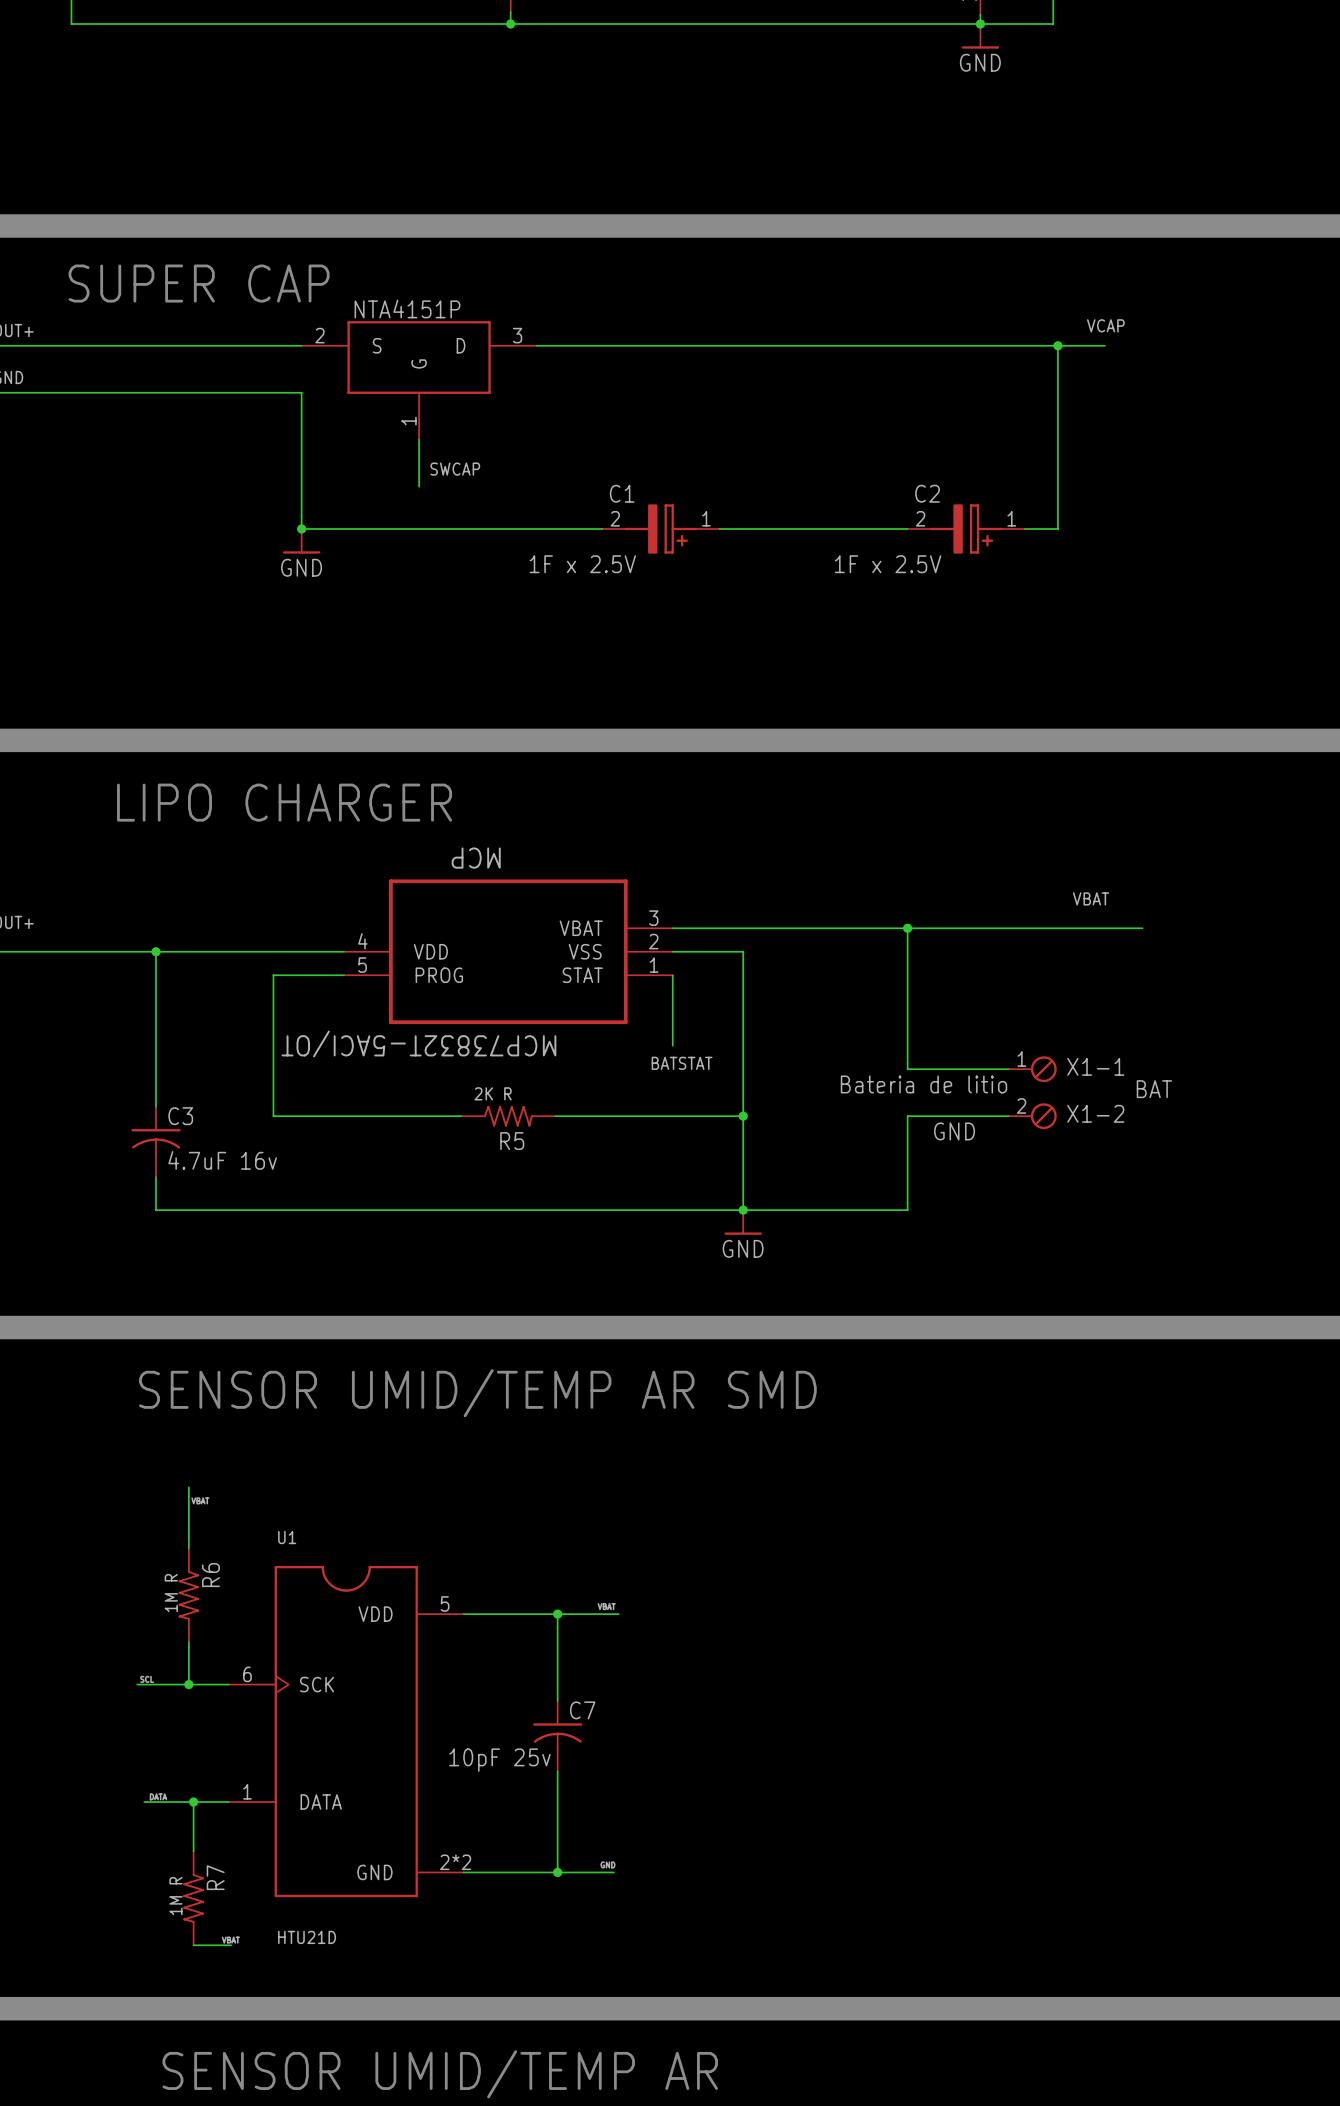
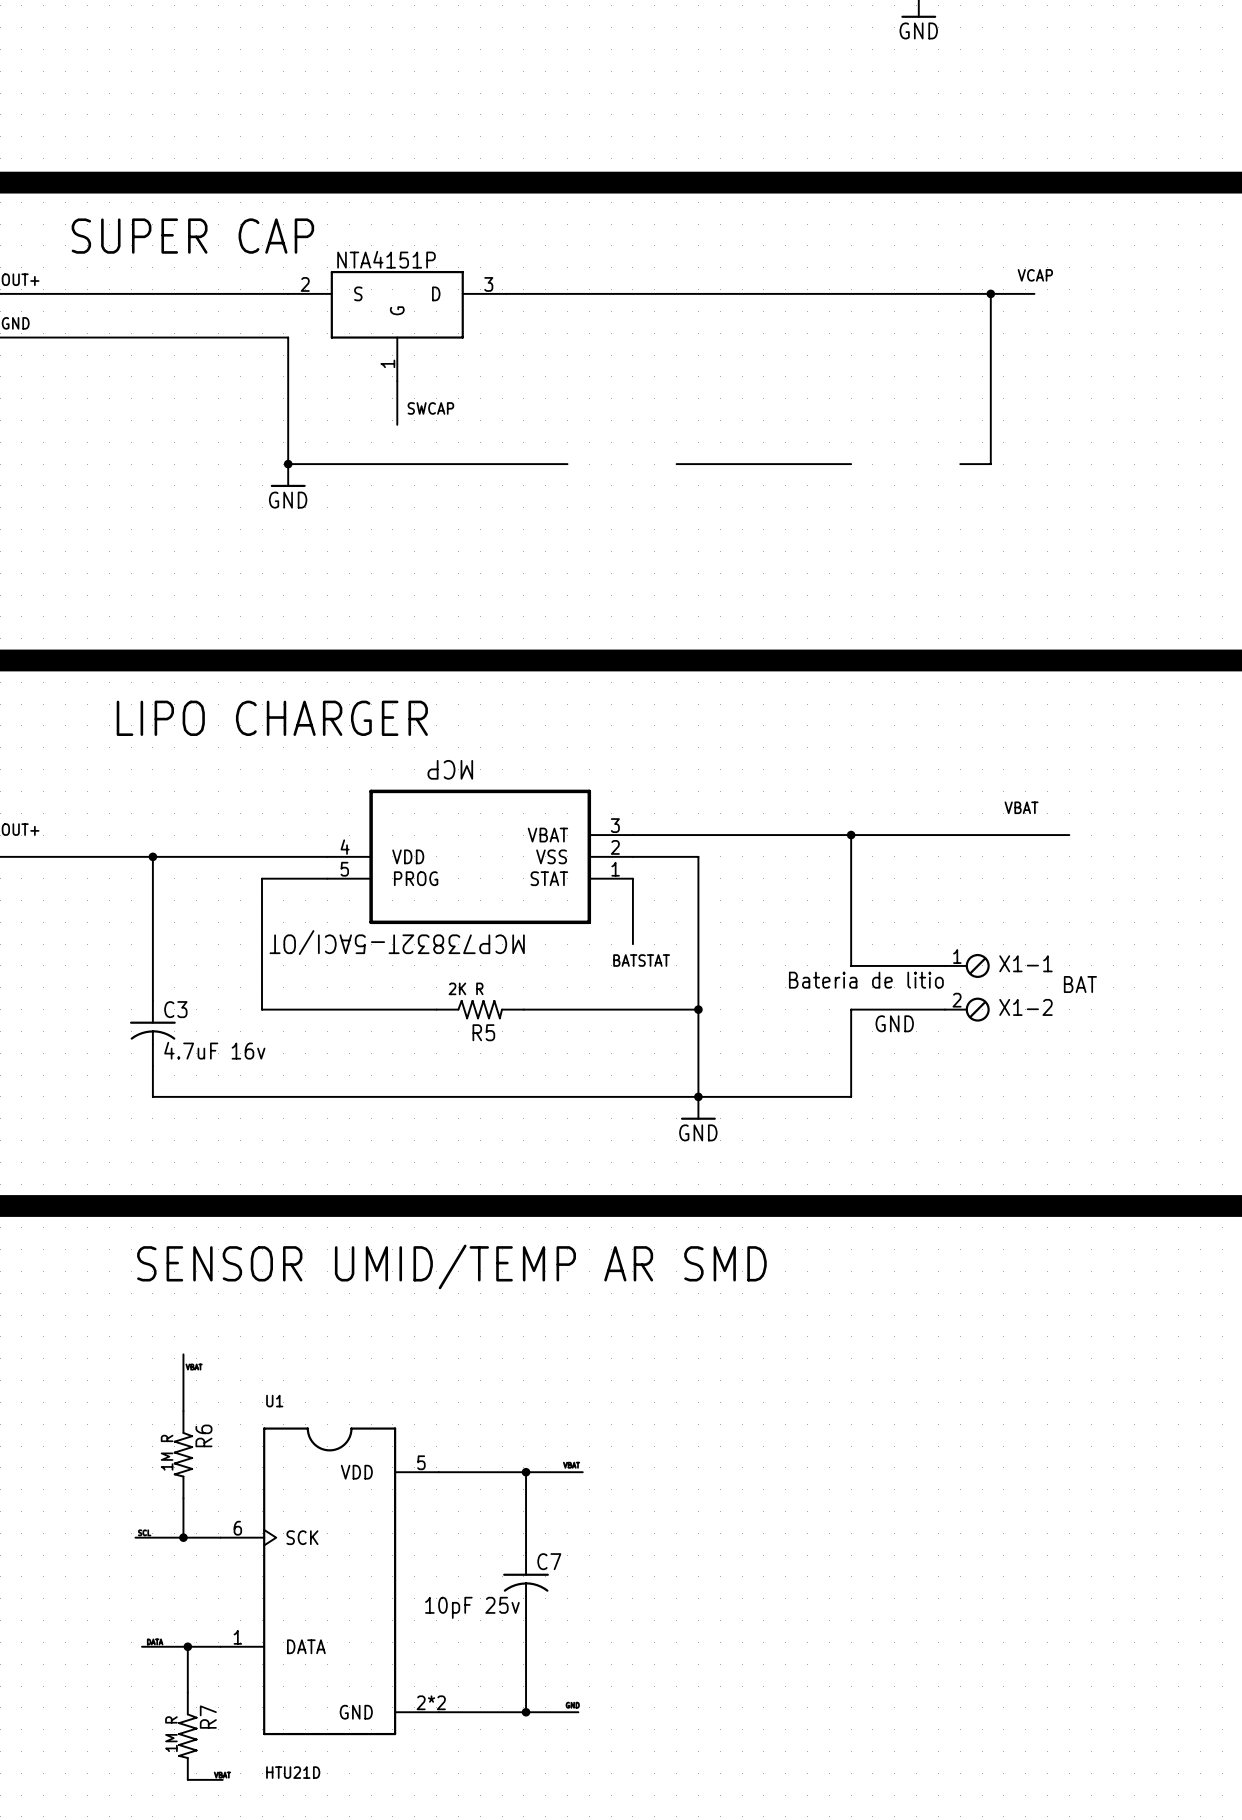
C1: 1F x 2.5V (661, 528) -> none
C2: 1F x 2.5V (966, 528) -> none

